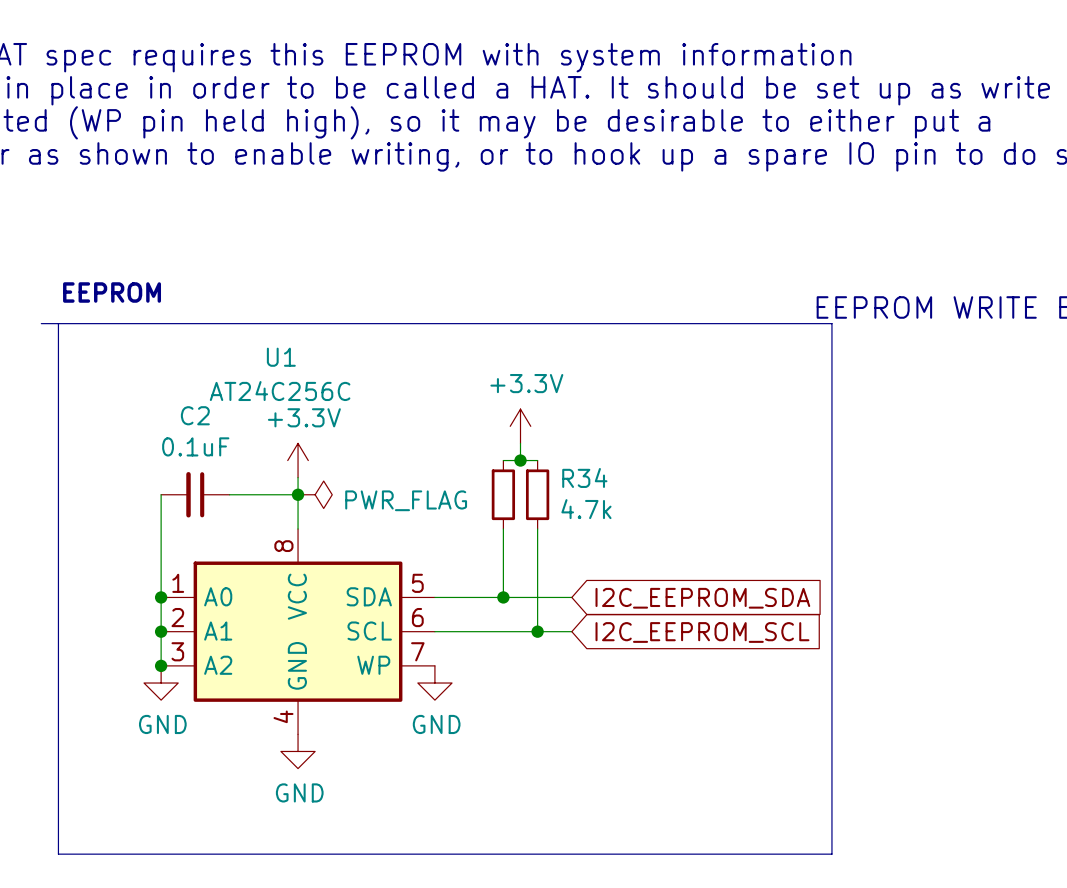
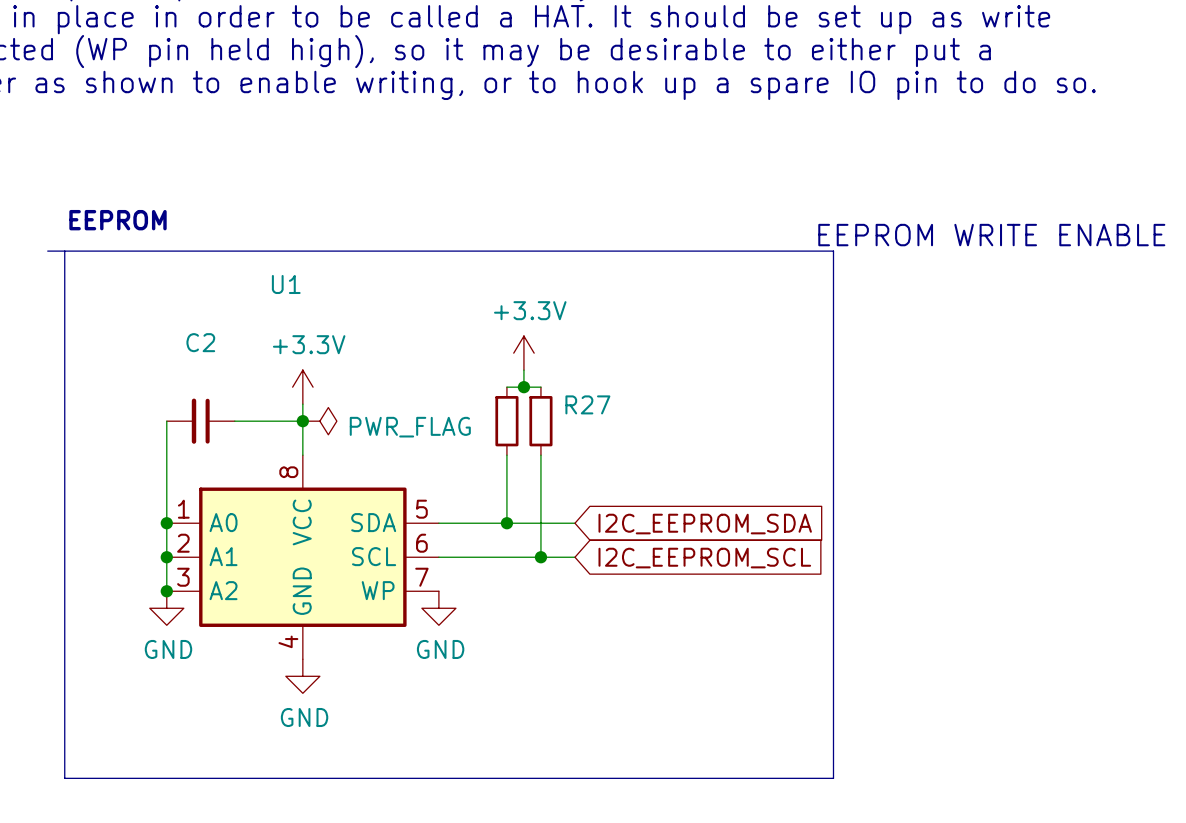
U1 value: AT24C256C (280, 391) -> none
C2 value: 0.1uF (195, 446) -> none
R34 name: R34 (584, 477) -> R27 (587, 404)
R34 value: 4.7k (586, 509) -> none

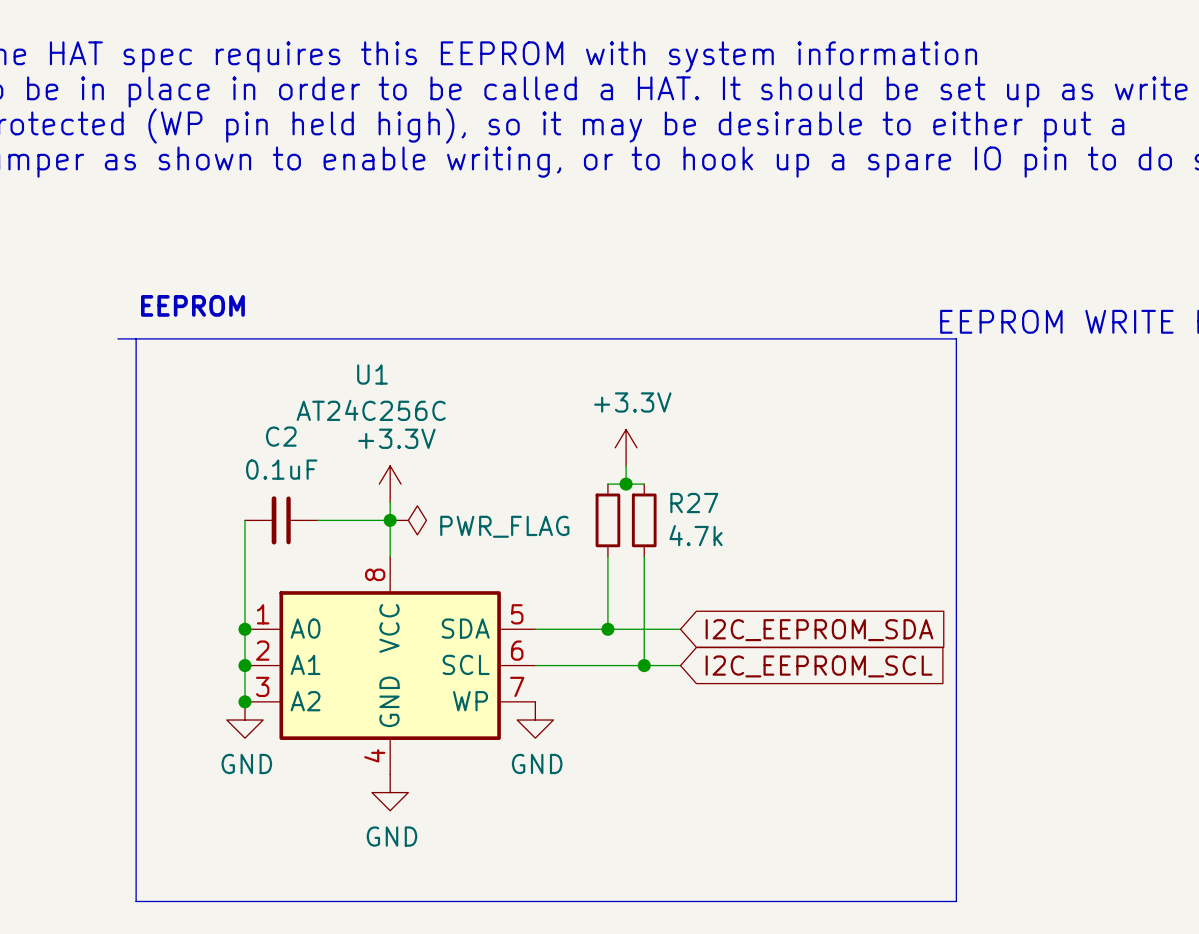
U1 value: none -> AT24C256C (371, 410)
C2 value: none -> 0.1uF (281, 469)
R27 value: none -> 4.7k (696, 535)

